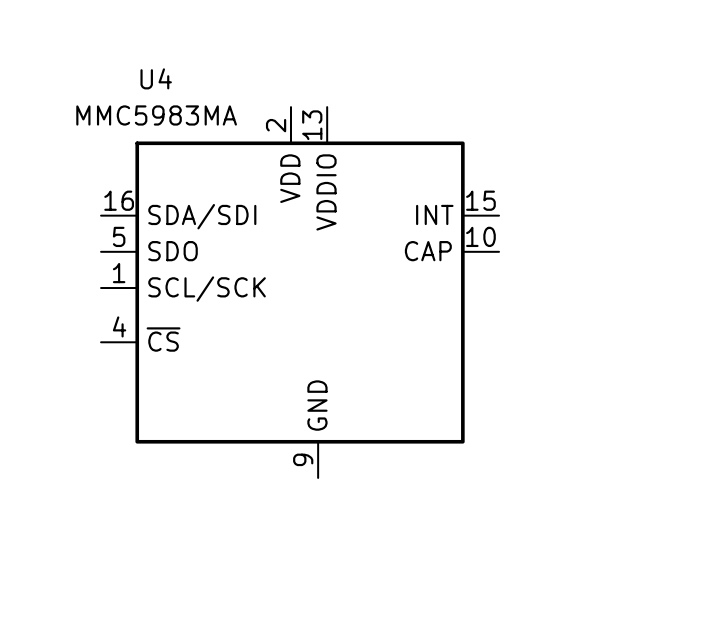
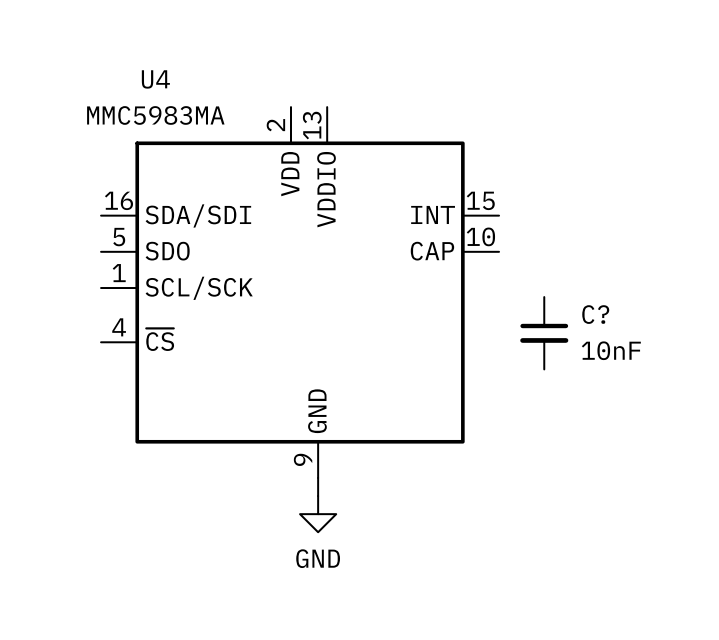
C?: none -> 10nF (544, 333)
wire: none -> (318, 477) (318, 496)
power symbol: none -> GND (318, 514)

